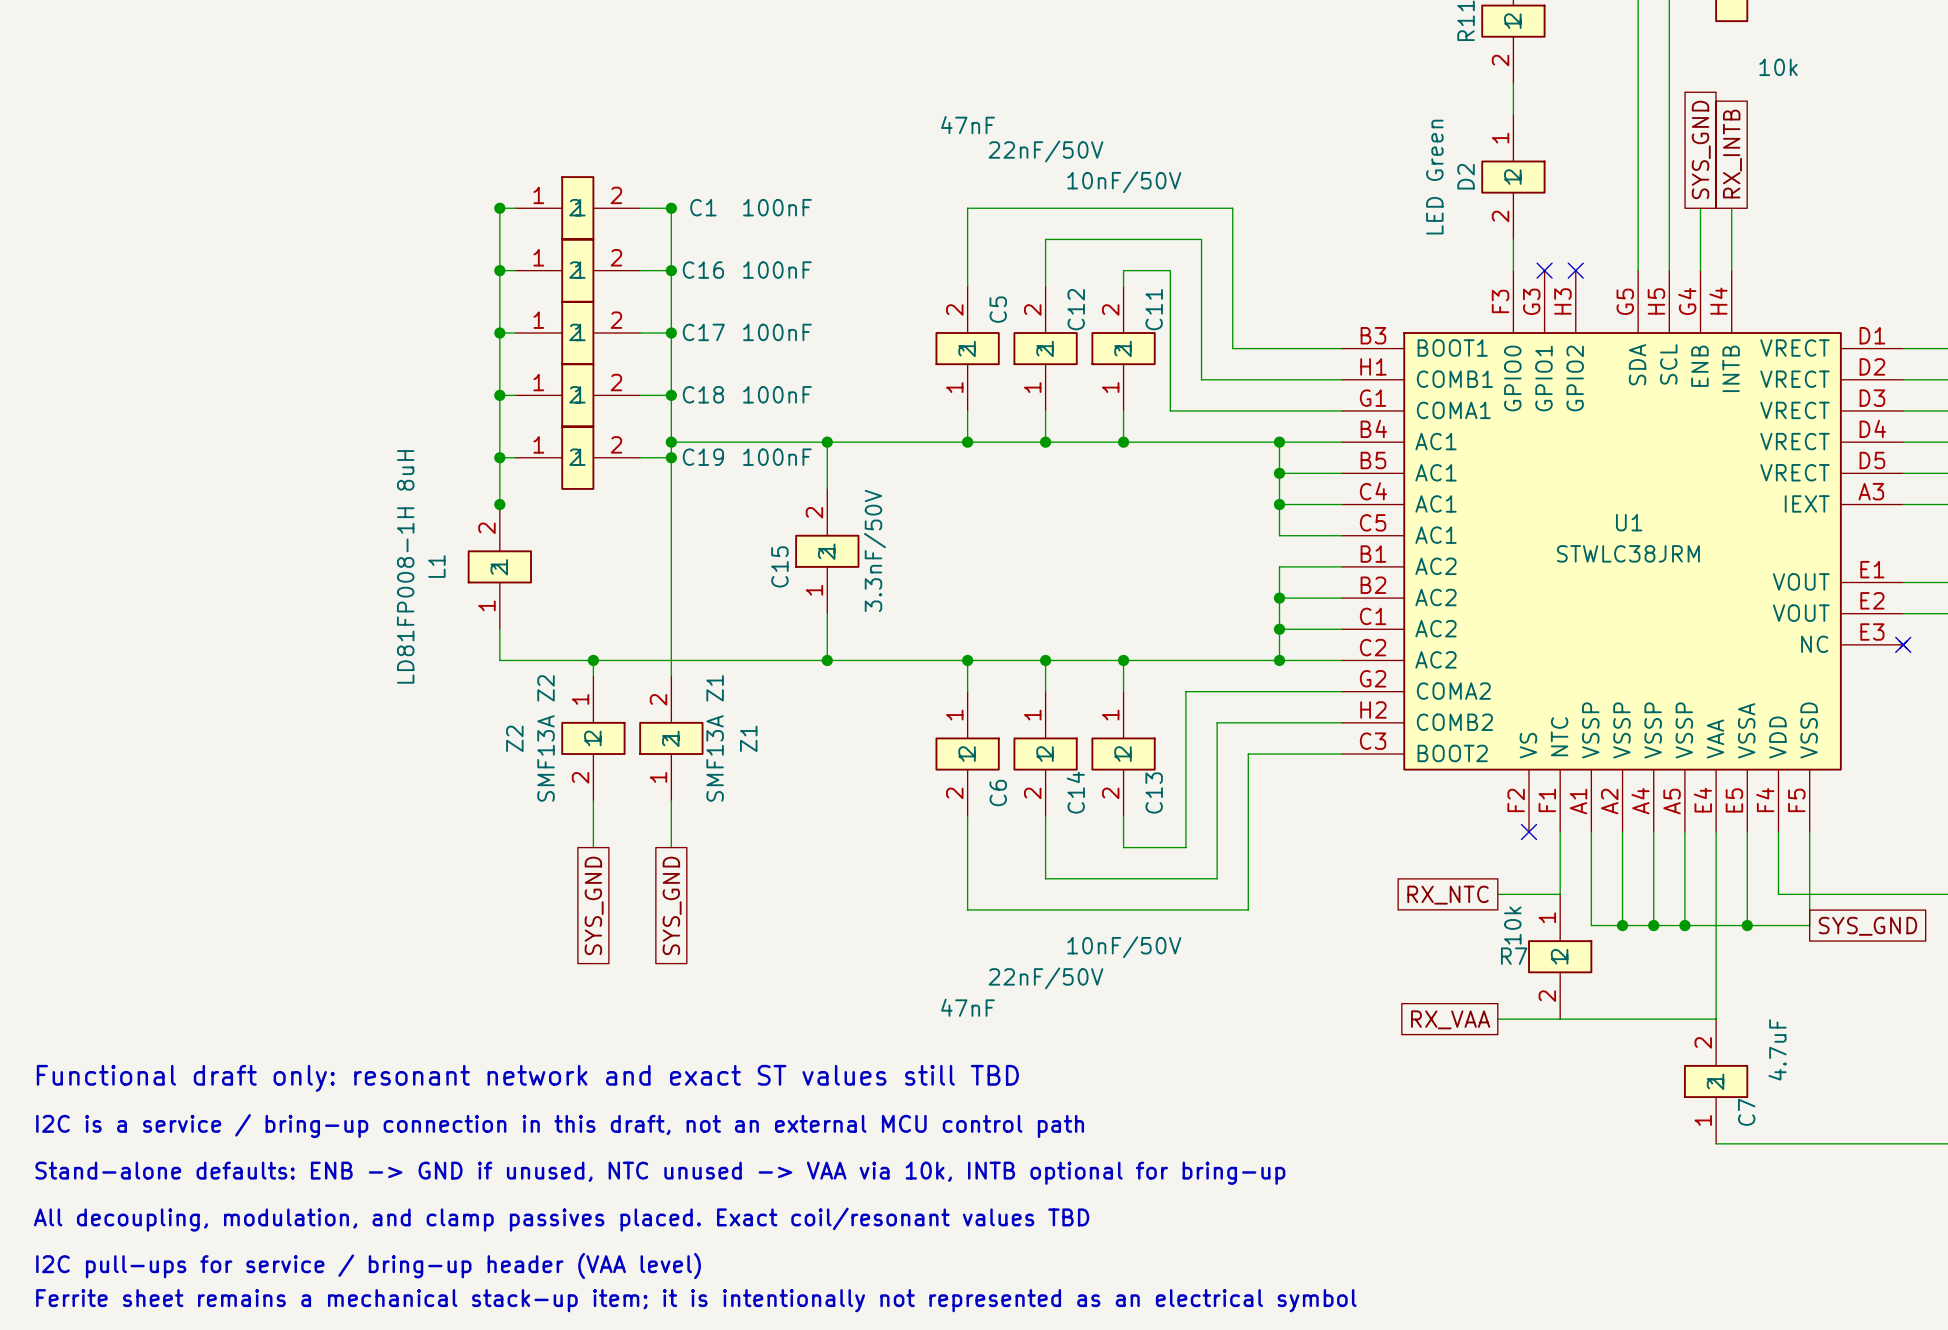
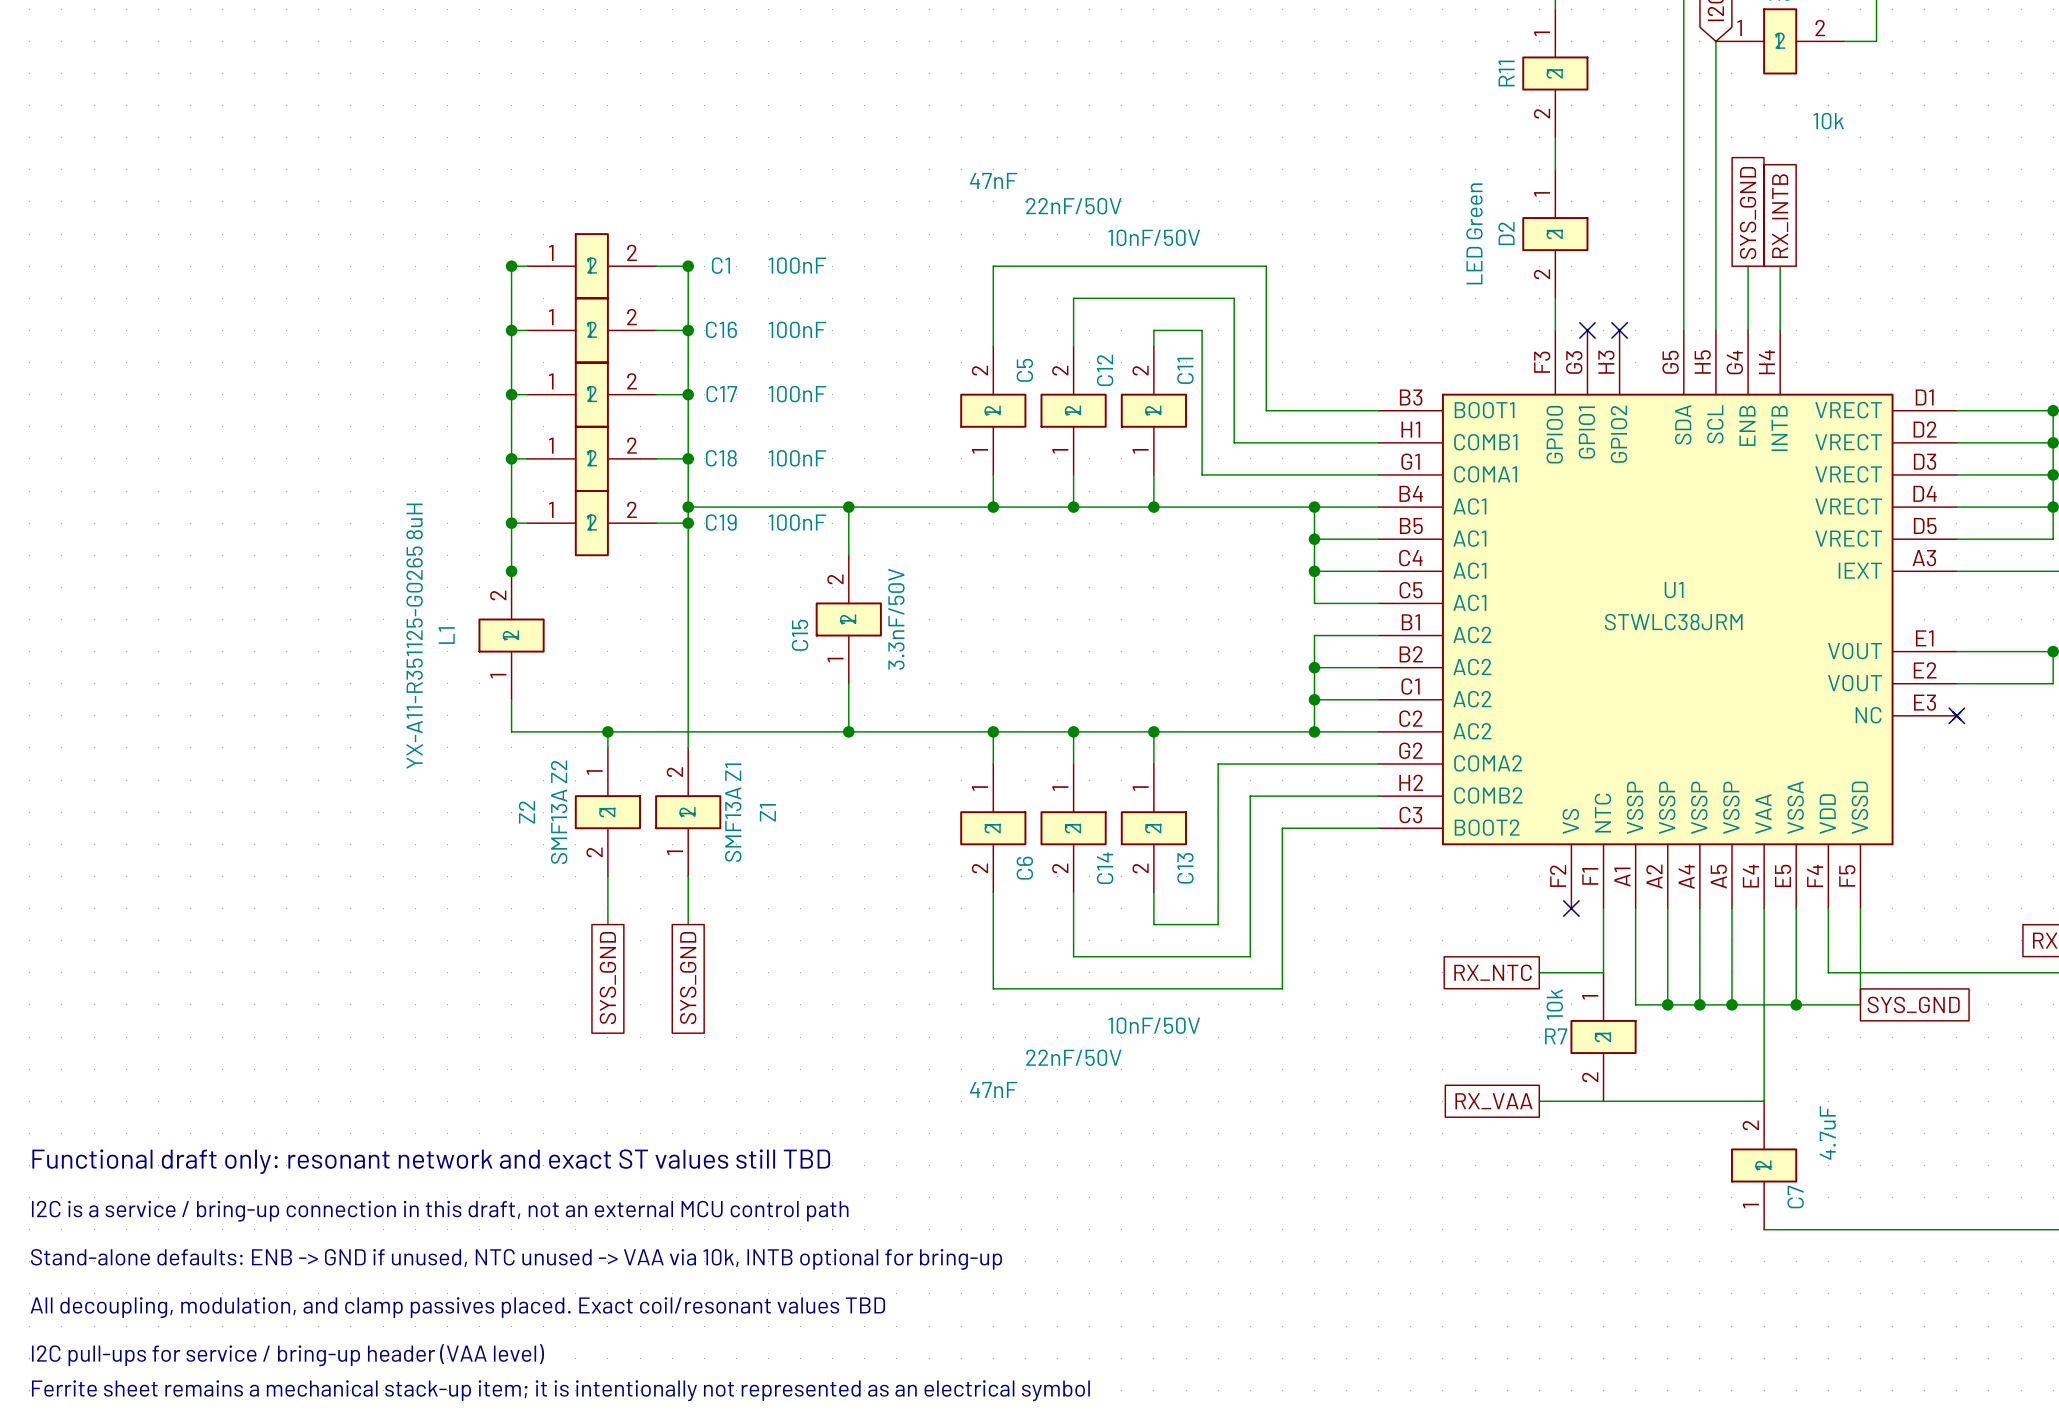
L1 value: LD81FP008-1H 8uH (405, 566) -> YX-A11-R351125-G0265 8uH (414, 636)

